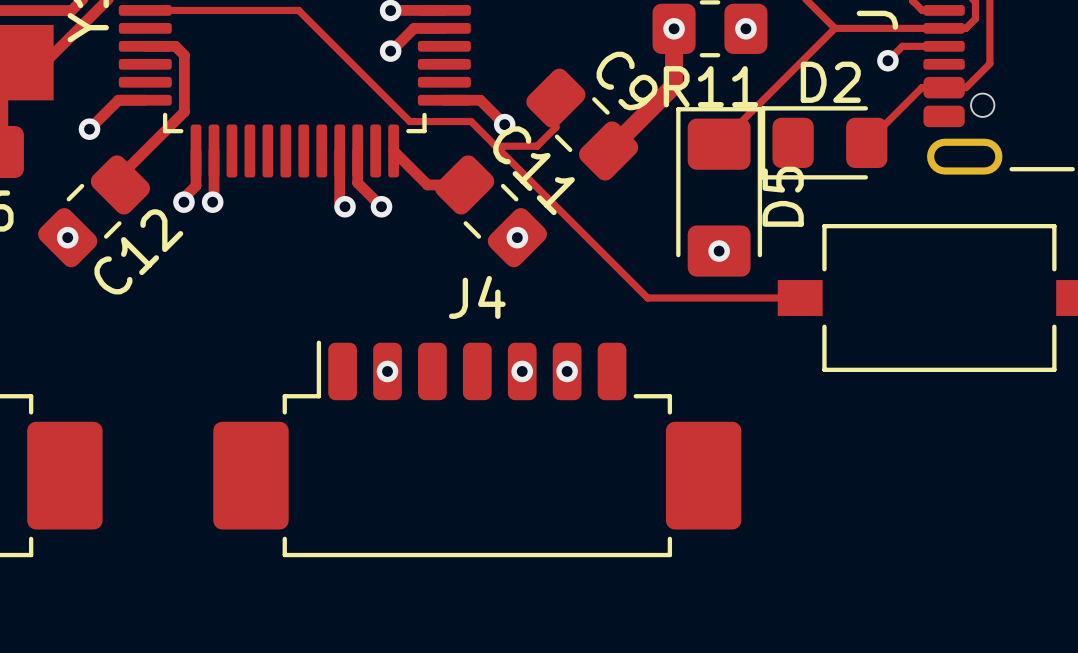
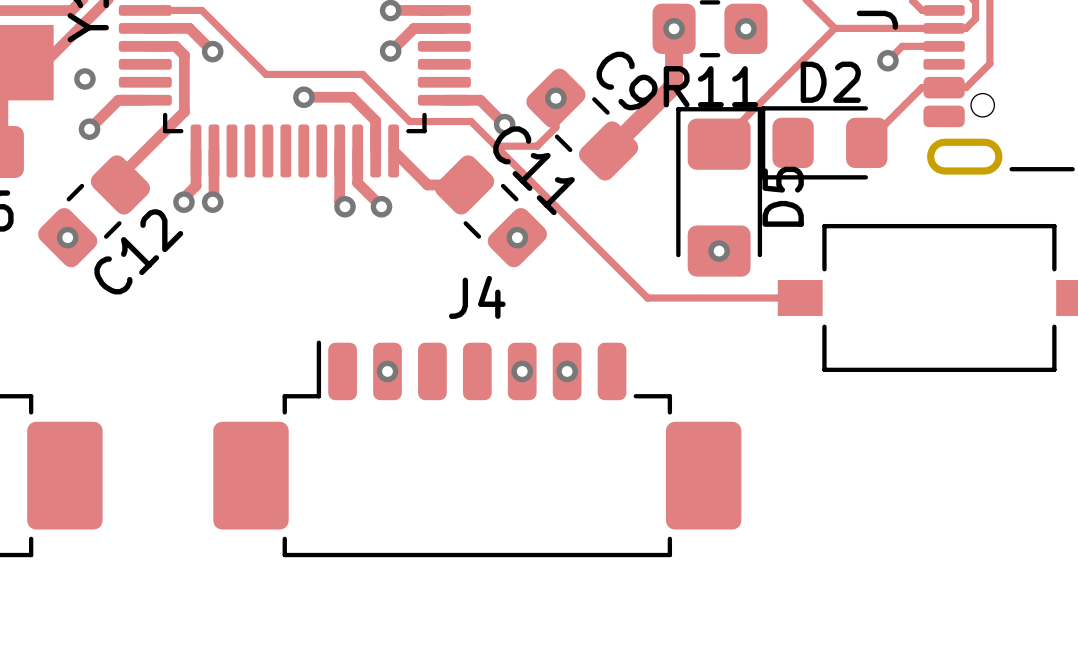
track: (201, 10) (298, 10) (362, 74) -> (201, 10) (265, 74) (362, 74)
track: none -> (145, 28) (189, 28) (212, 51)
via: none -> (212, 51)
via: none -> (84, 79)
track: none -> (303, 97) (352, 97) (375, 120) (375, 150)
via: none -> (303, 97)
via: none -> (555, 98)

